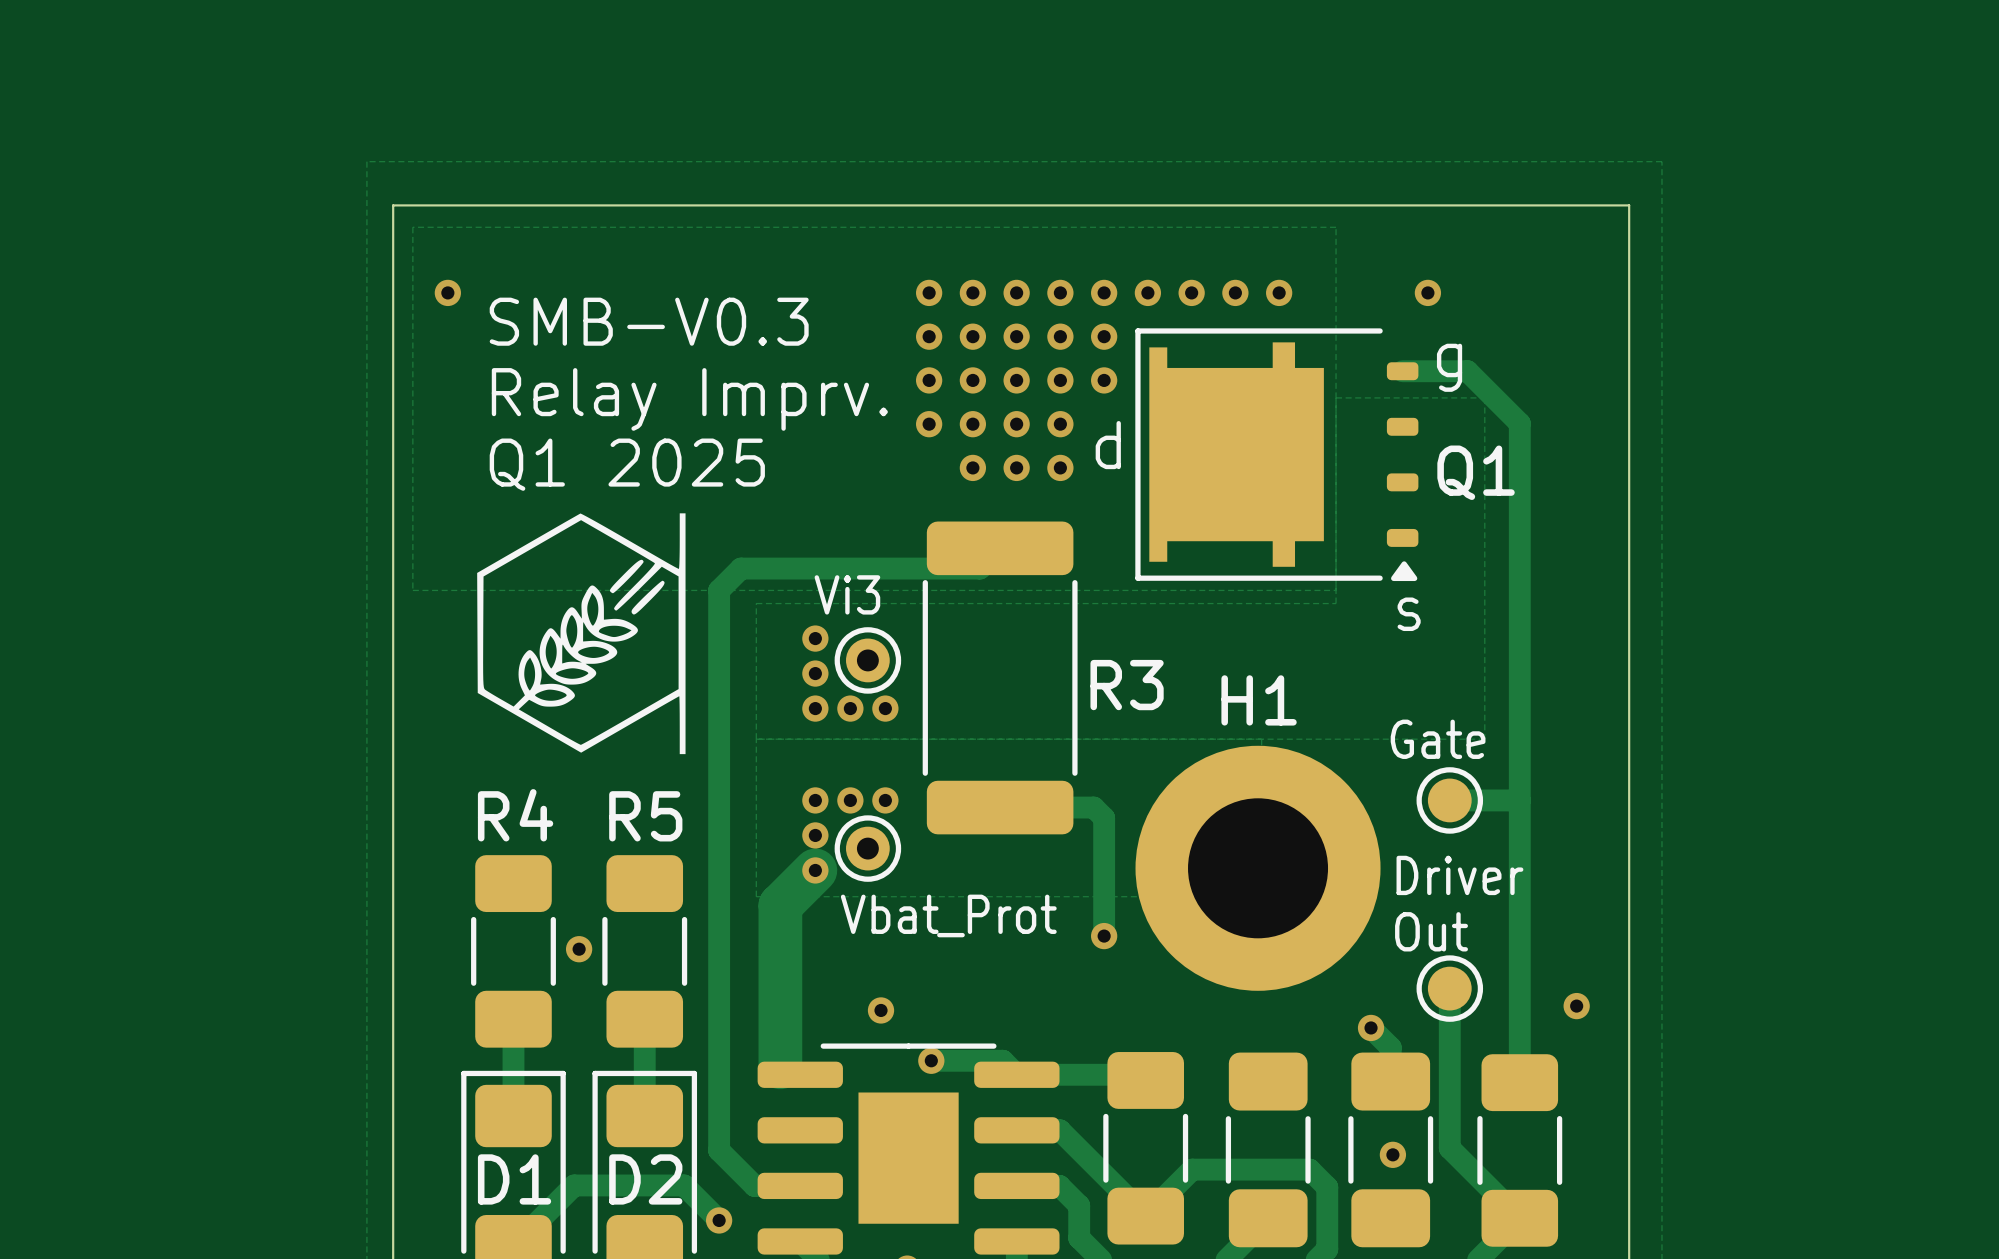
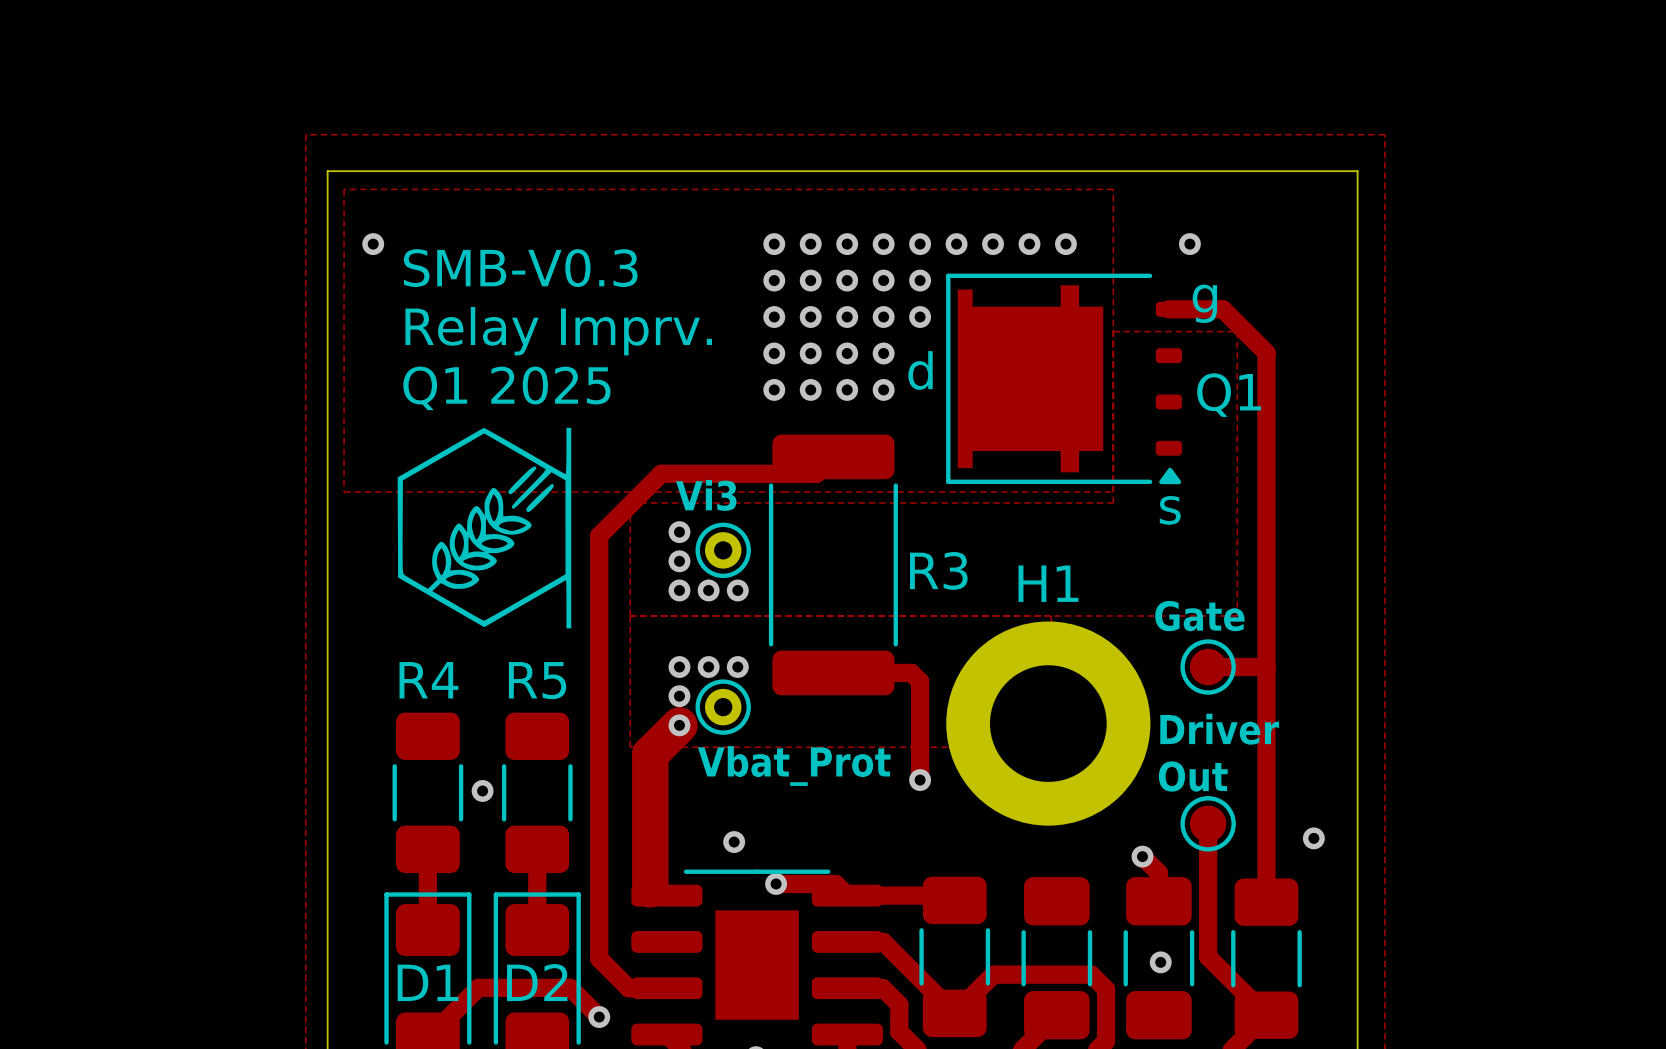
via: none -> (774, 389)
track: (793, 568) (741, 568) (719, 590) (719, 642) -> (661, 473) (599, 535)

